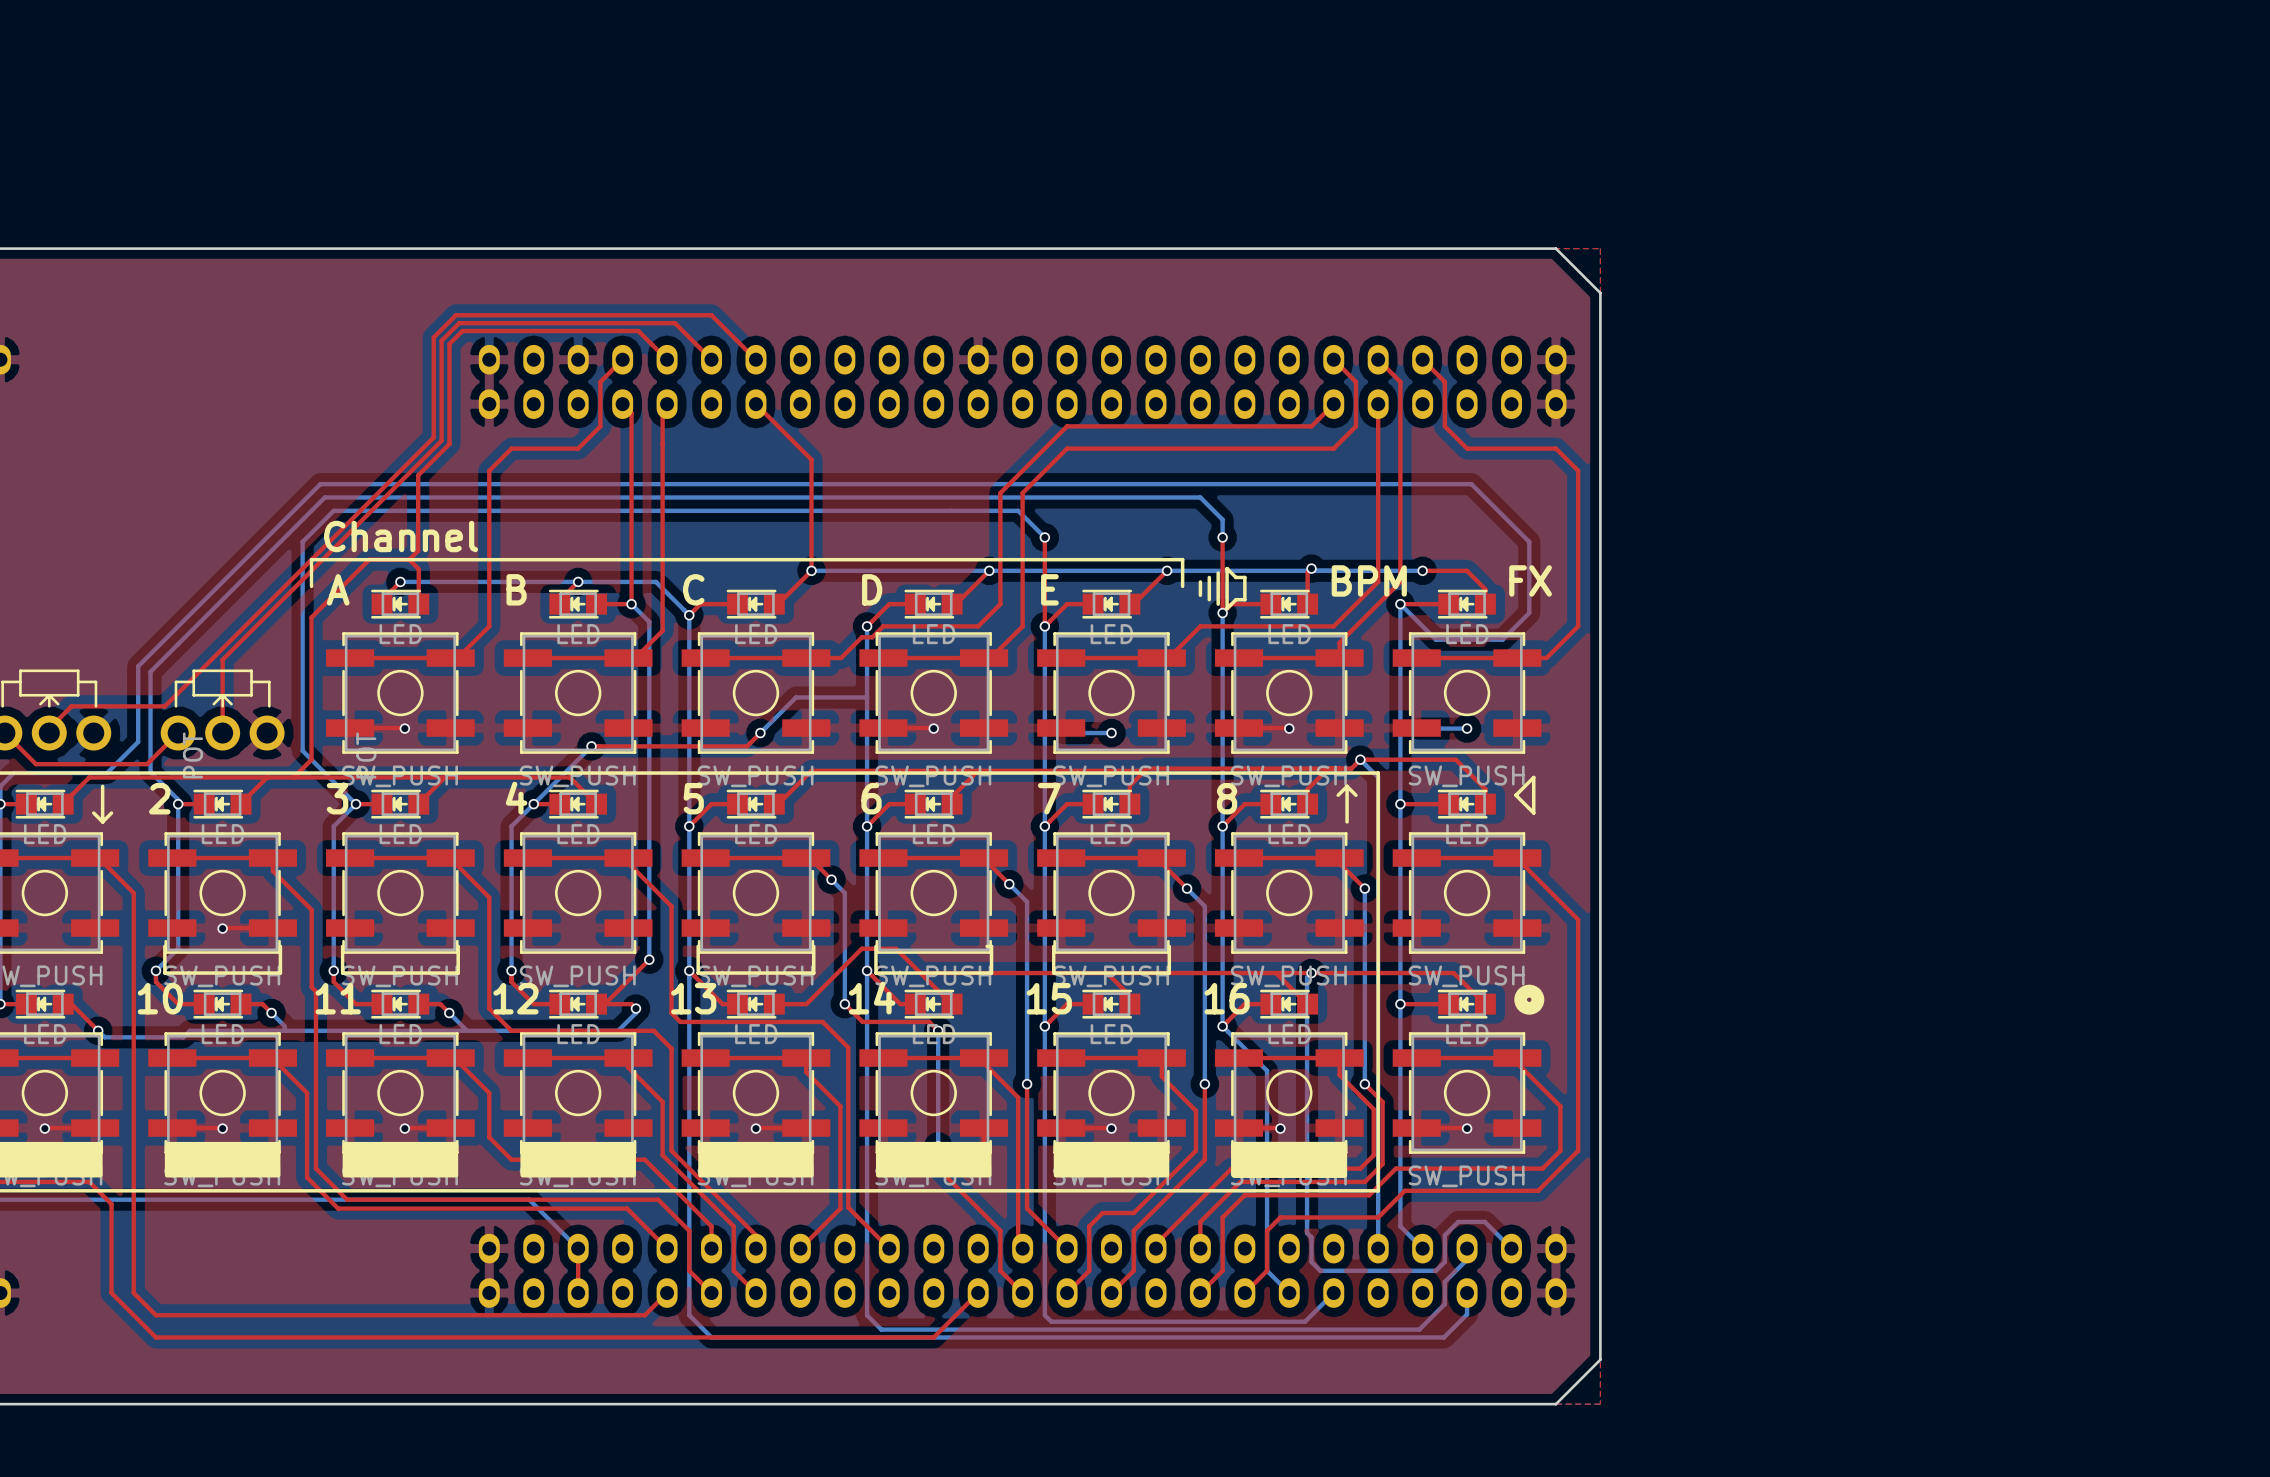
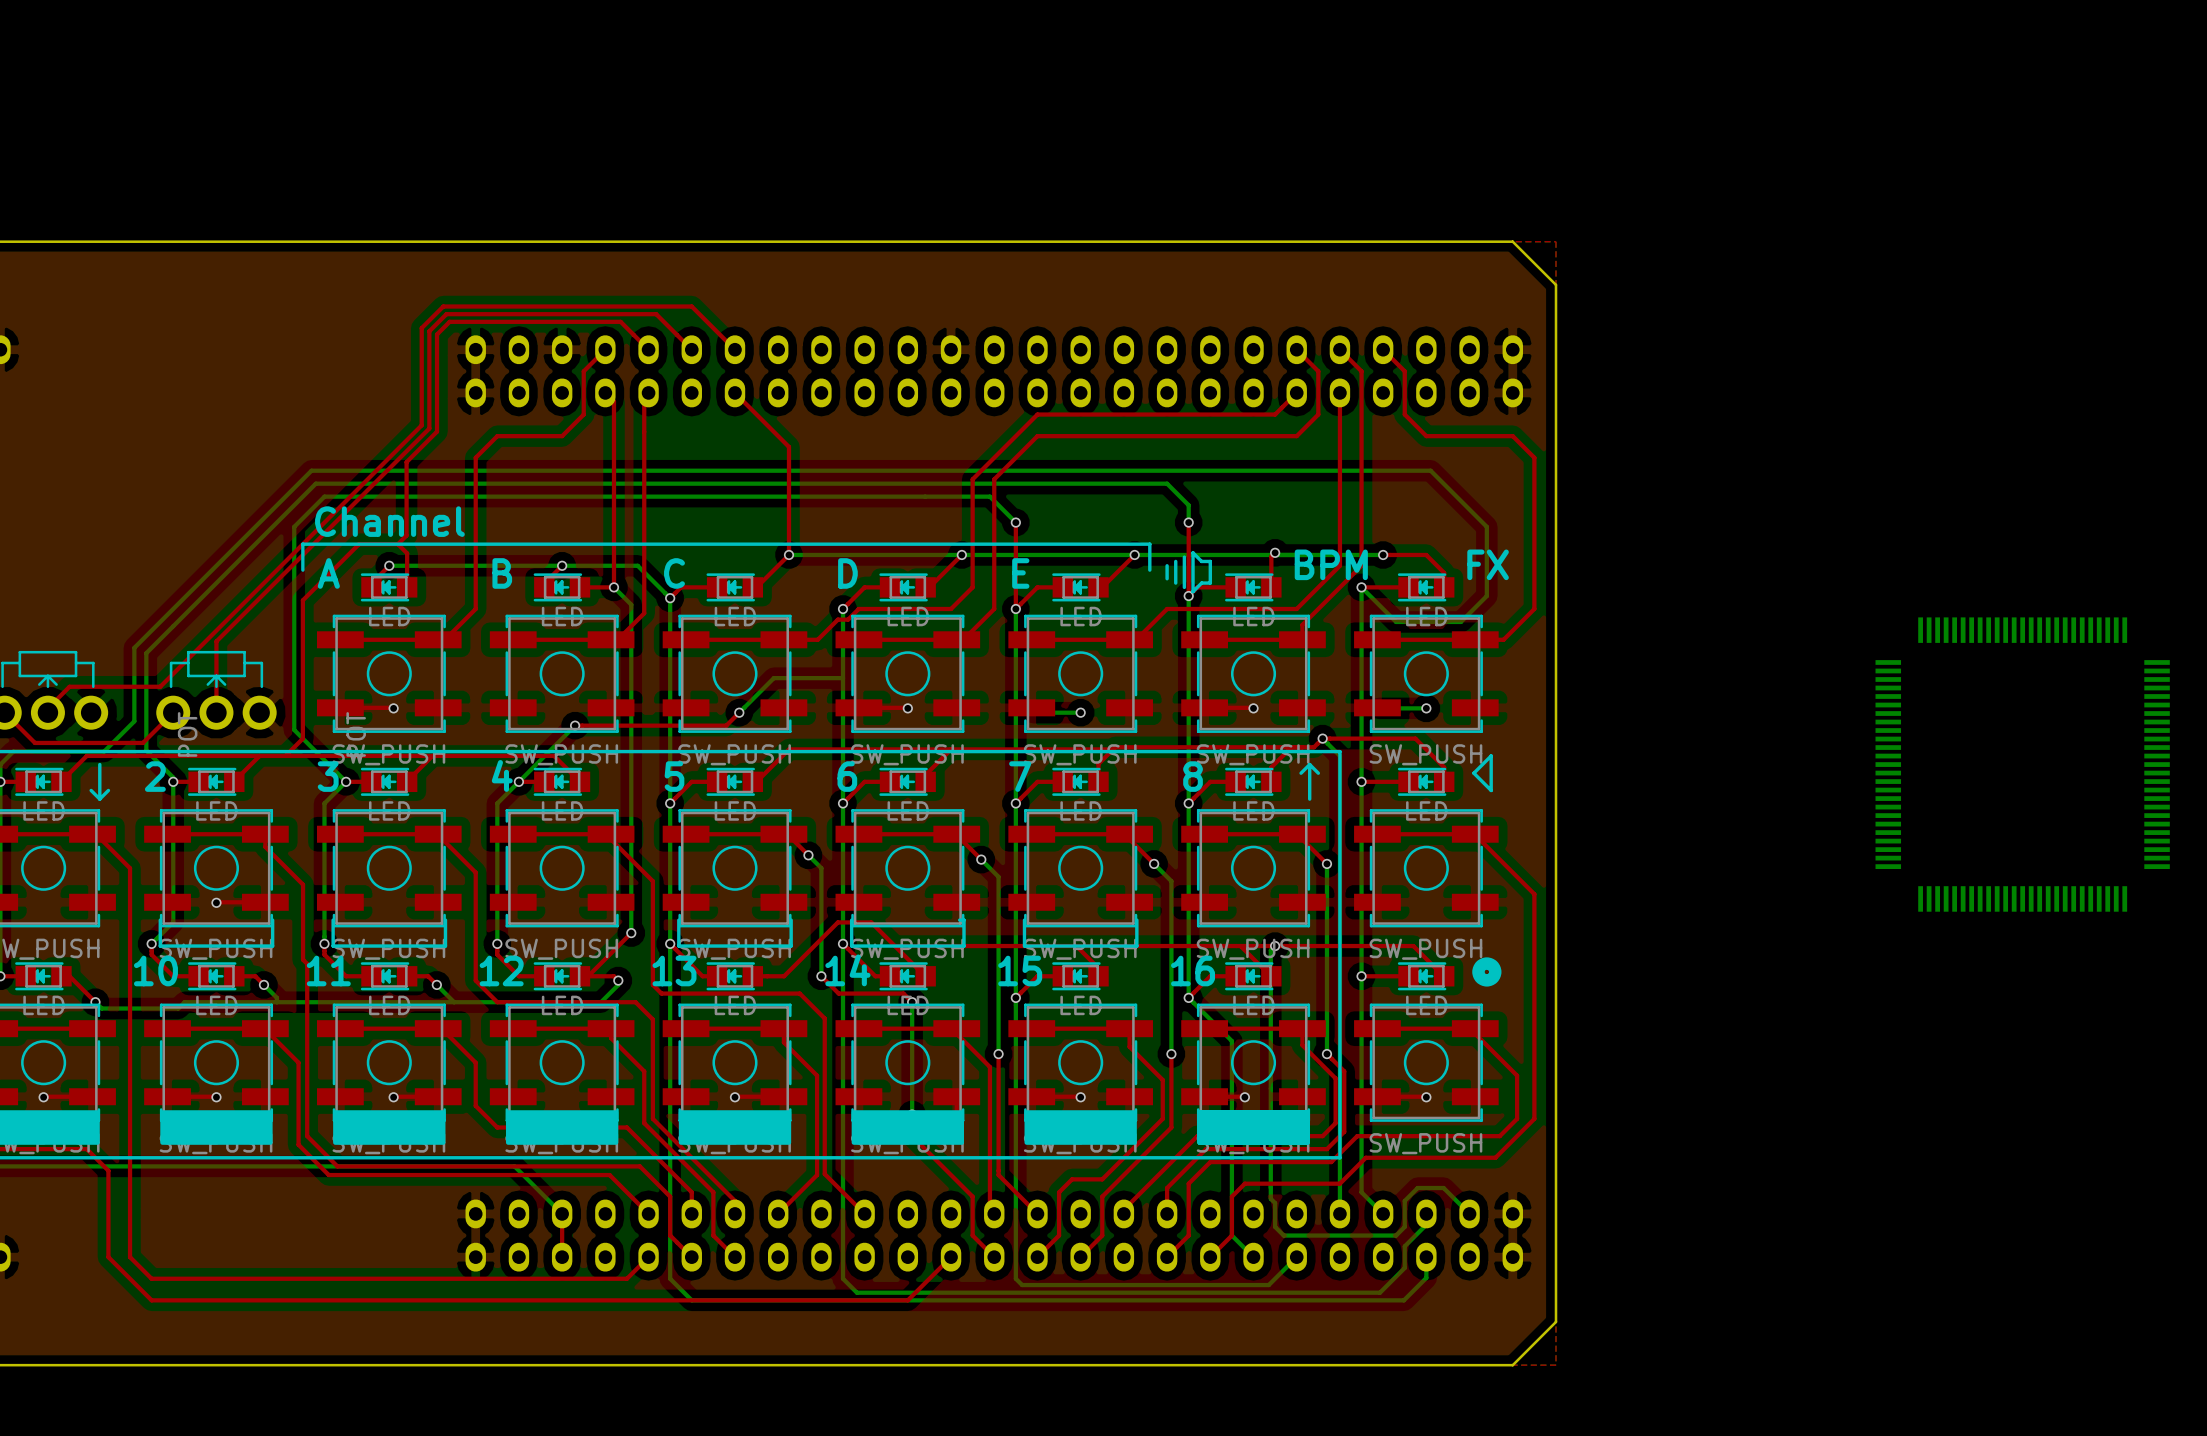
part: none -> (2022, 764)

